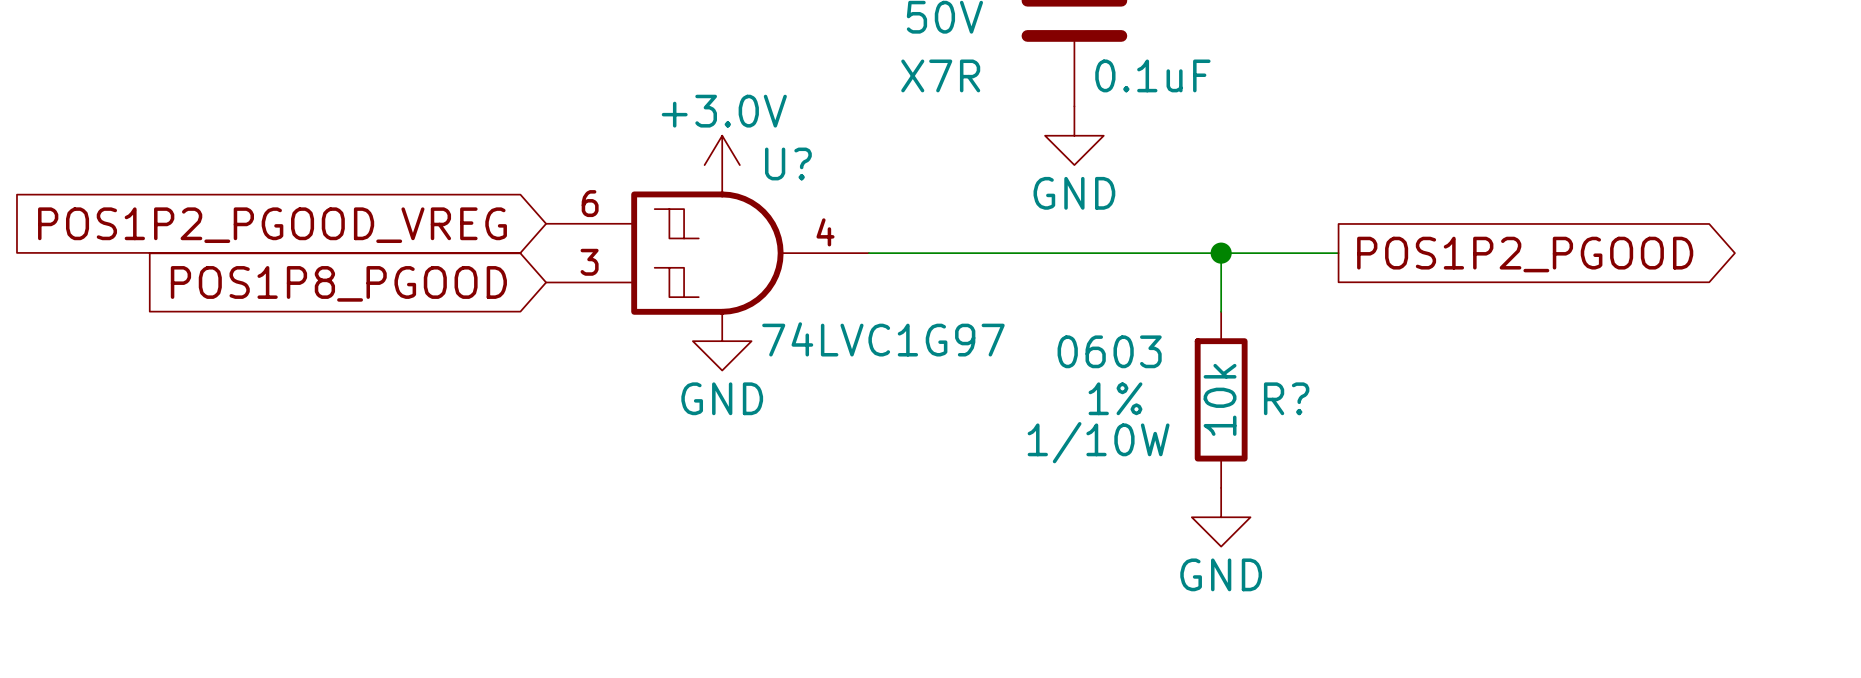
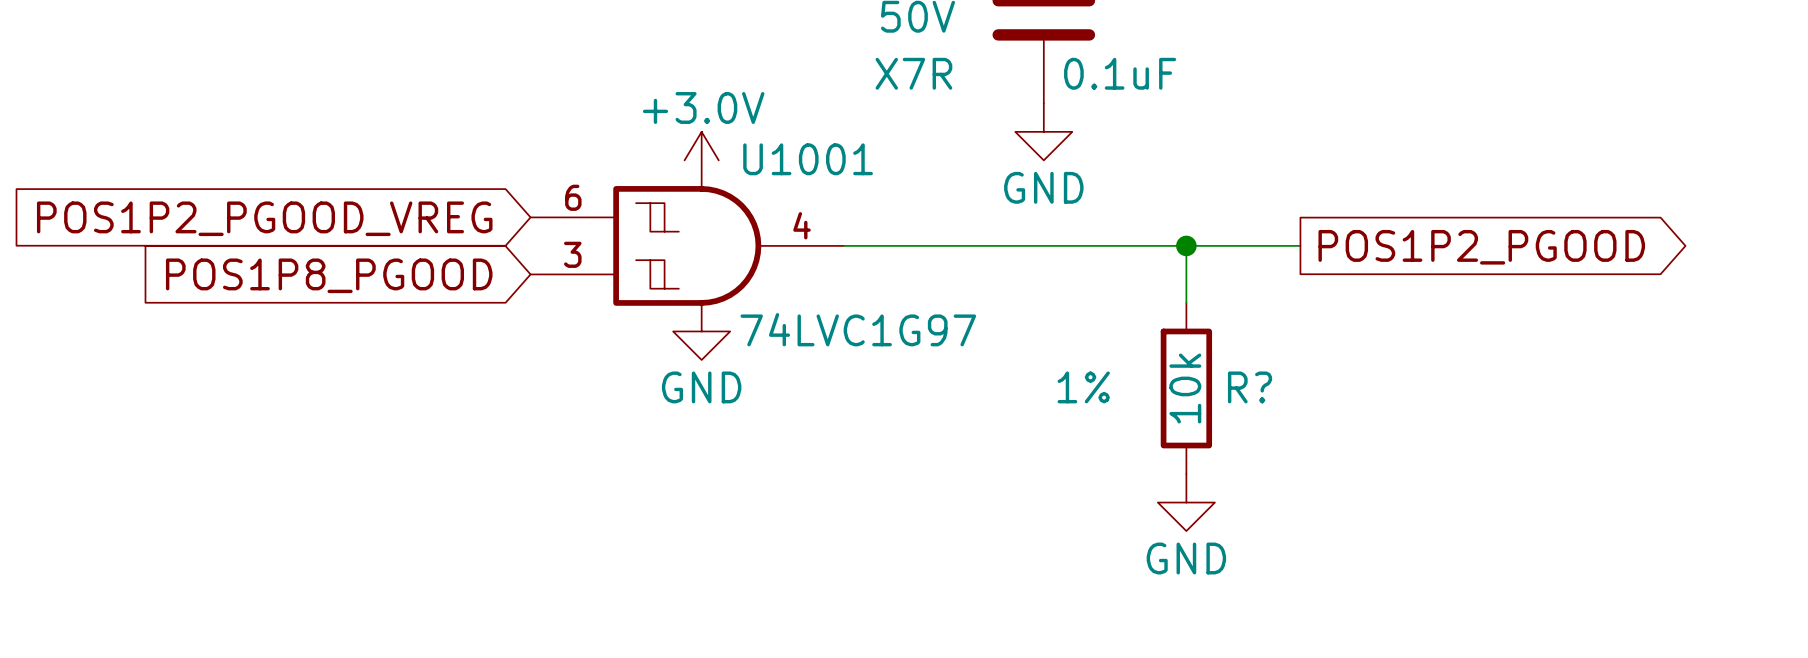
U? name: U? (788, 163) -> U1001 (808, 159)
R? text: 0603 (1109, 351) -> none
R? text: 1/10W (1098, 442) -> none

